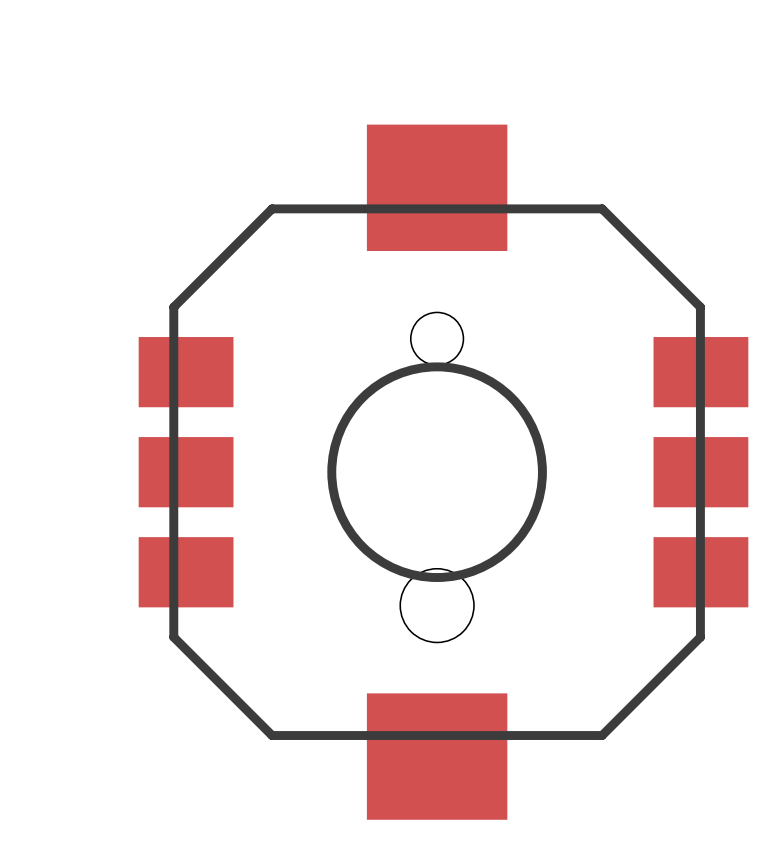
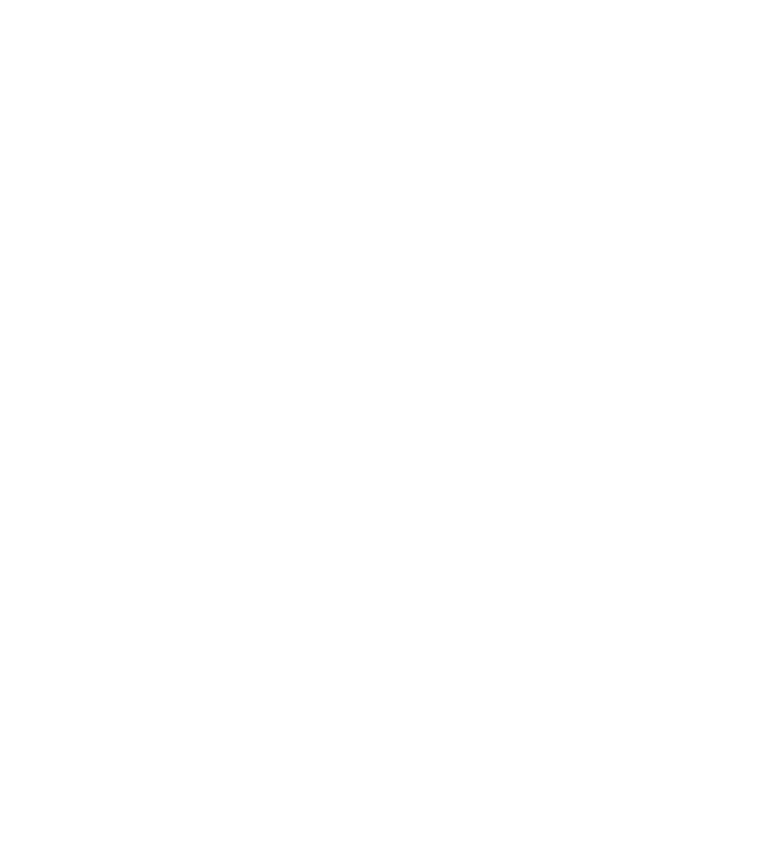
part: (443, 472) -> none

